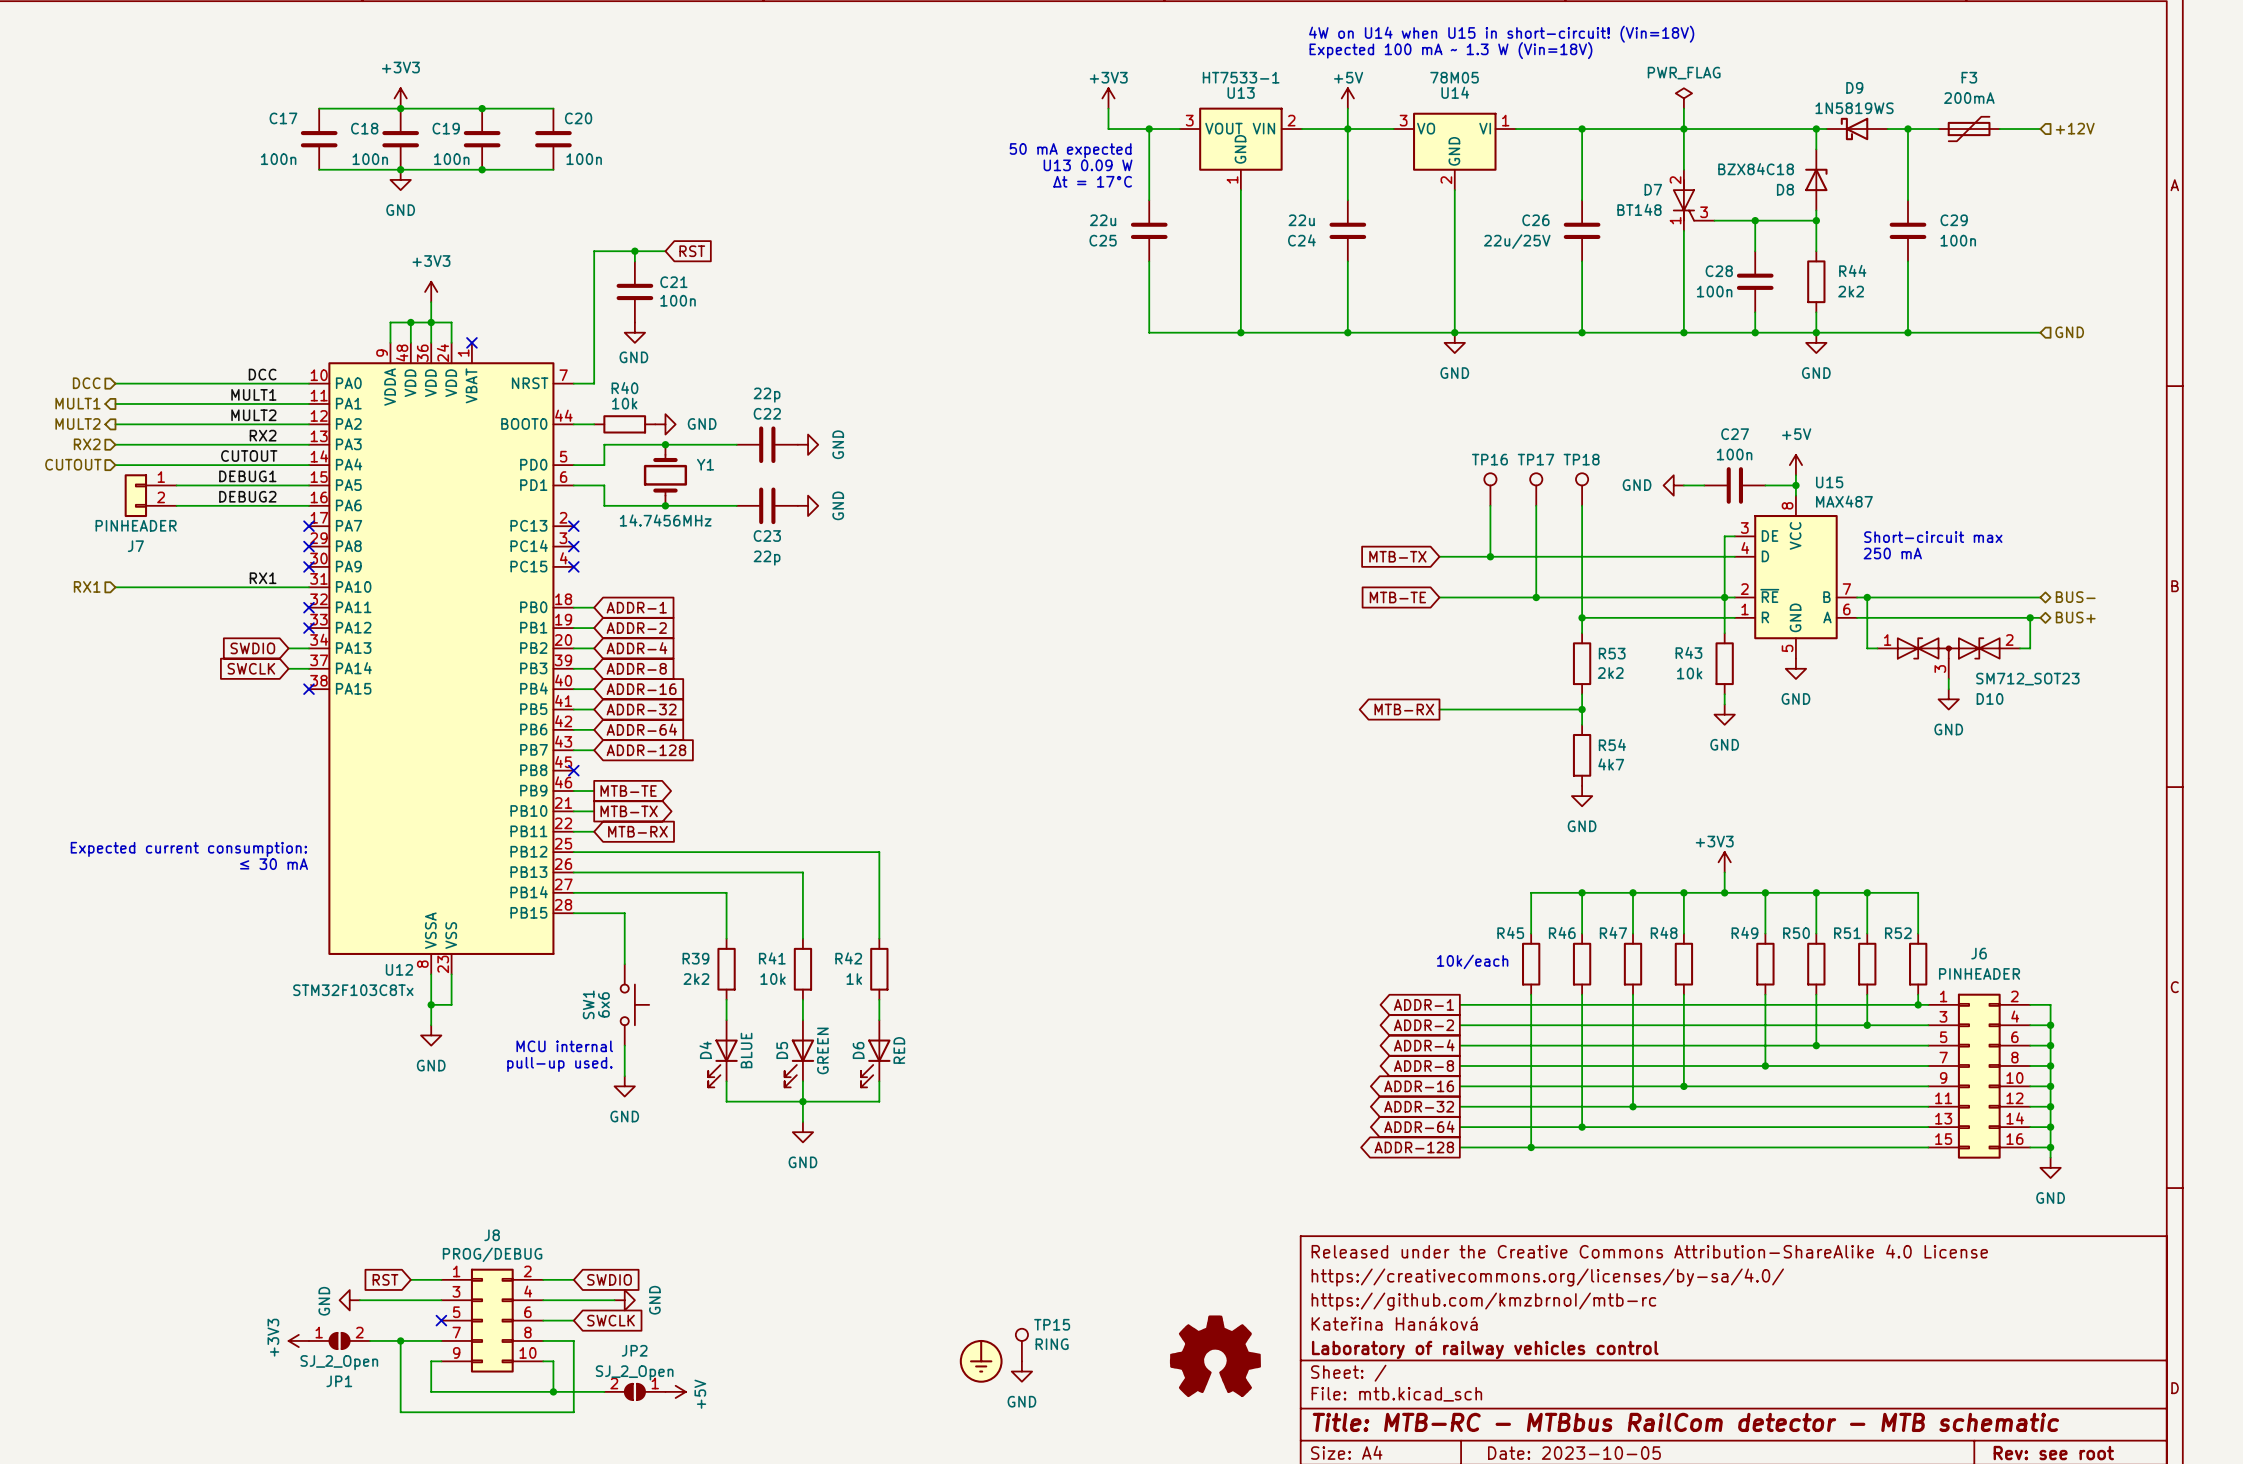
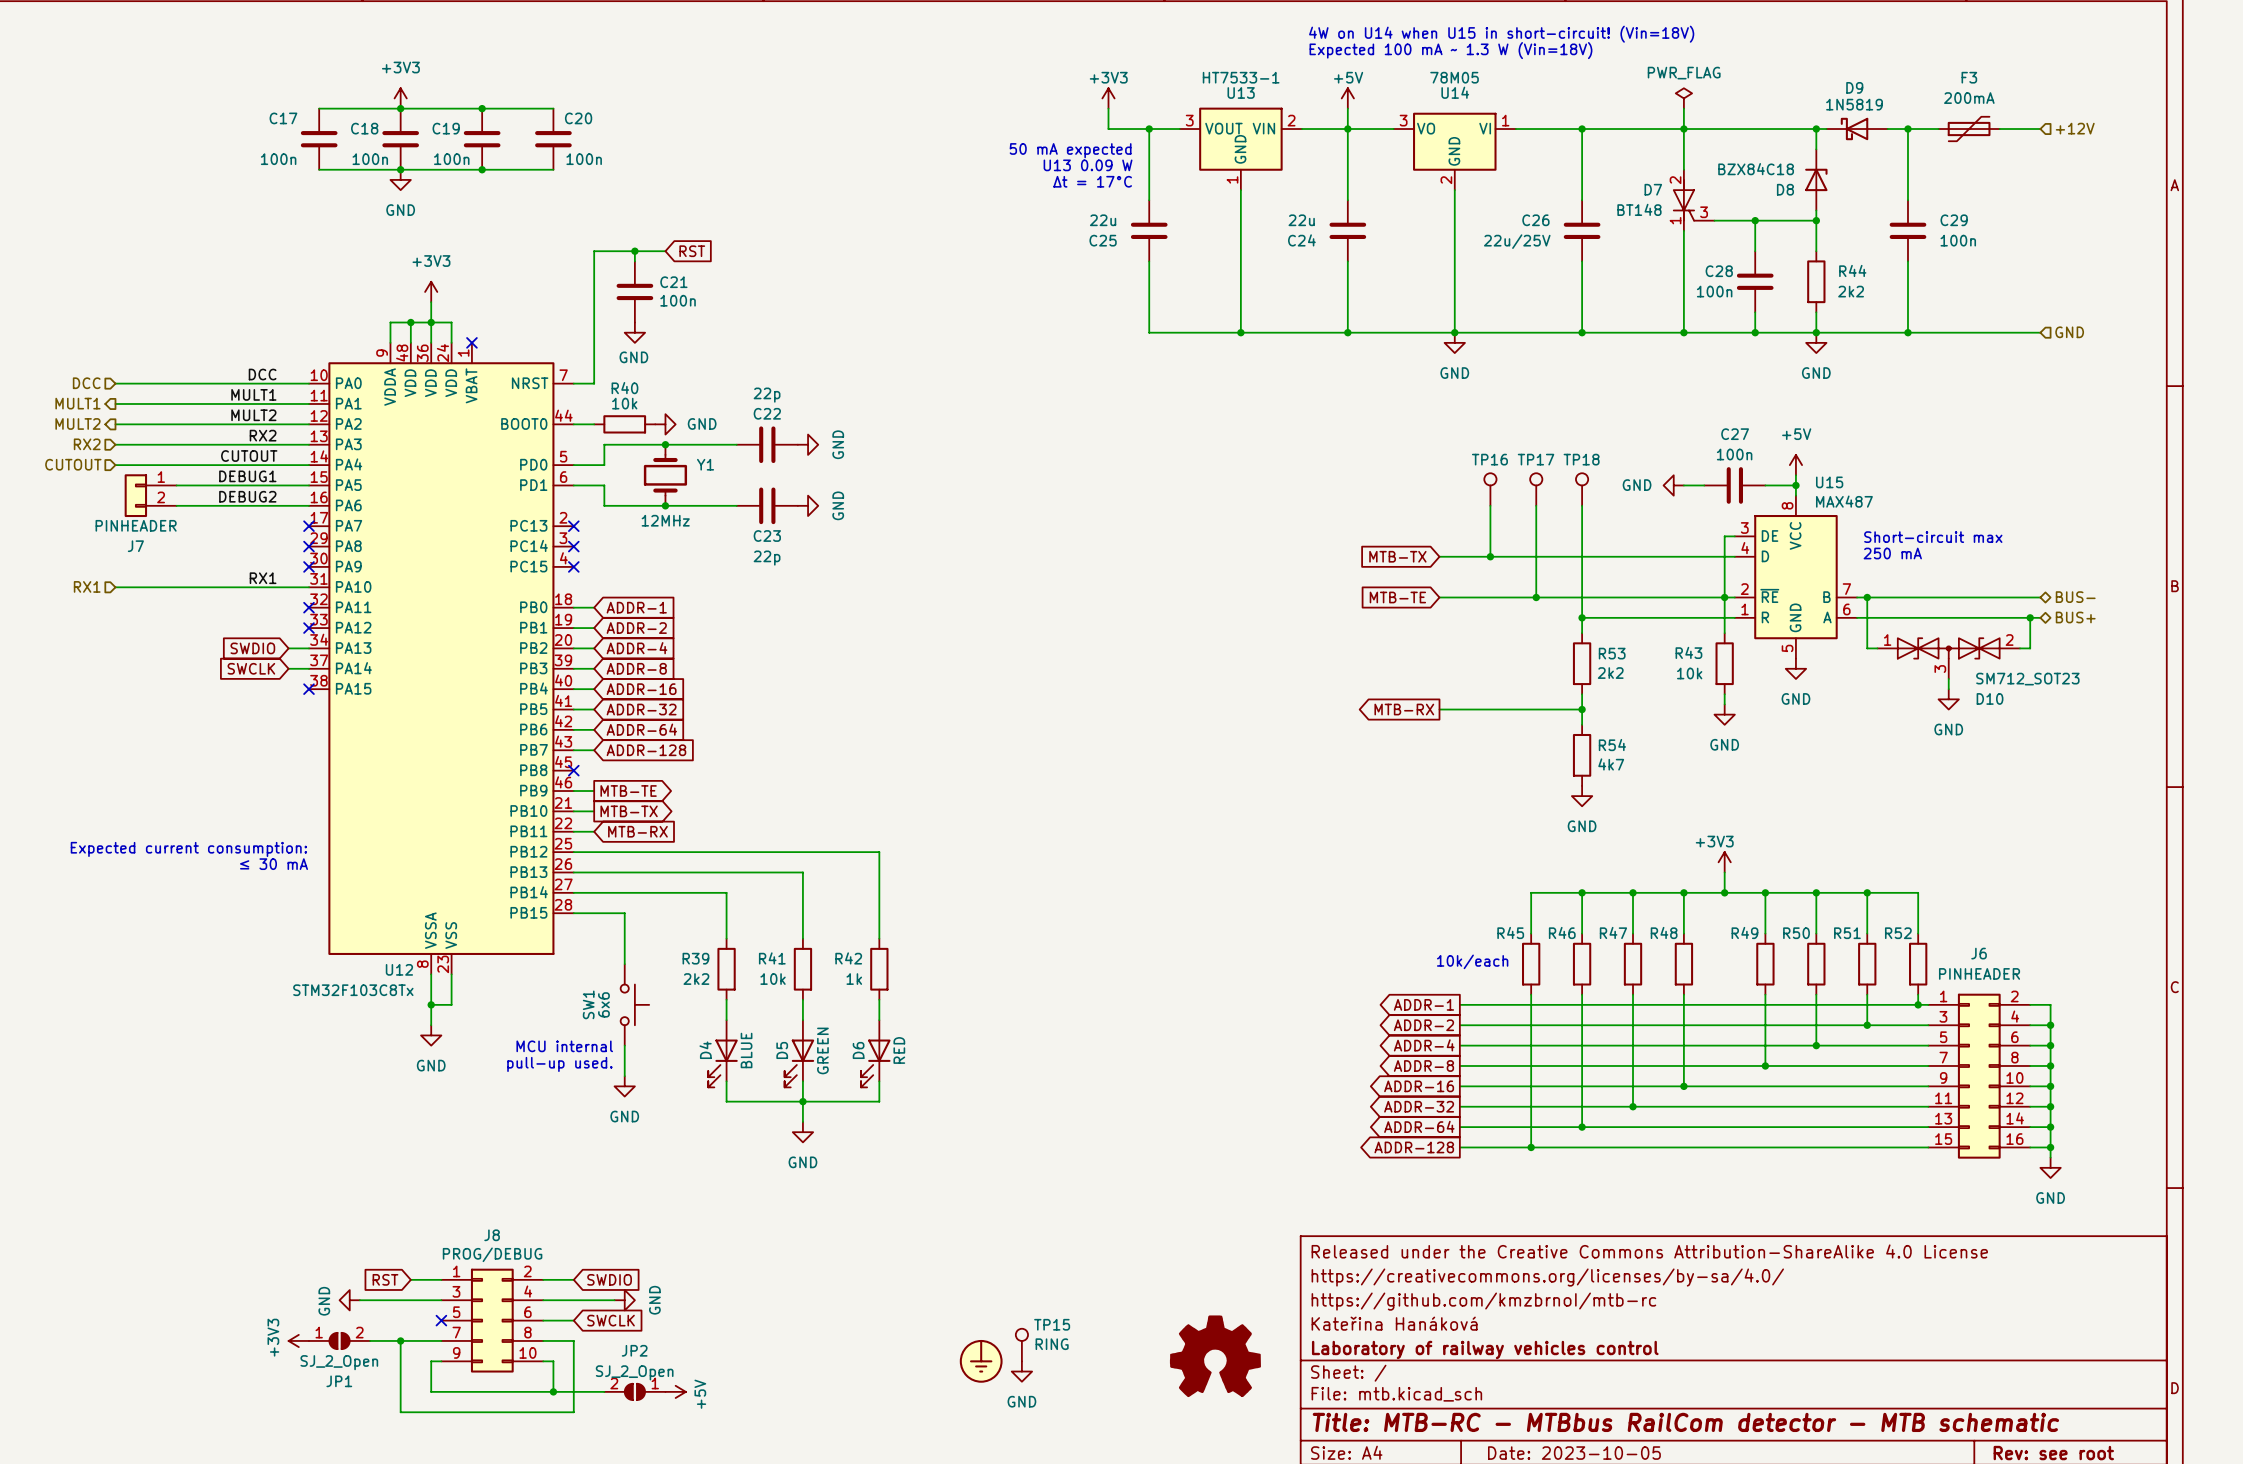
D9 value: 1N5819WS (1854, 108) -> 1N5819 (1854, 104)
Y1 value: 14.7456MHz (665, 520) -> 12MHz (665, 520)

